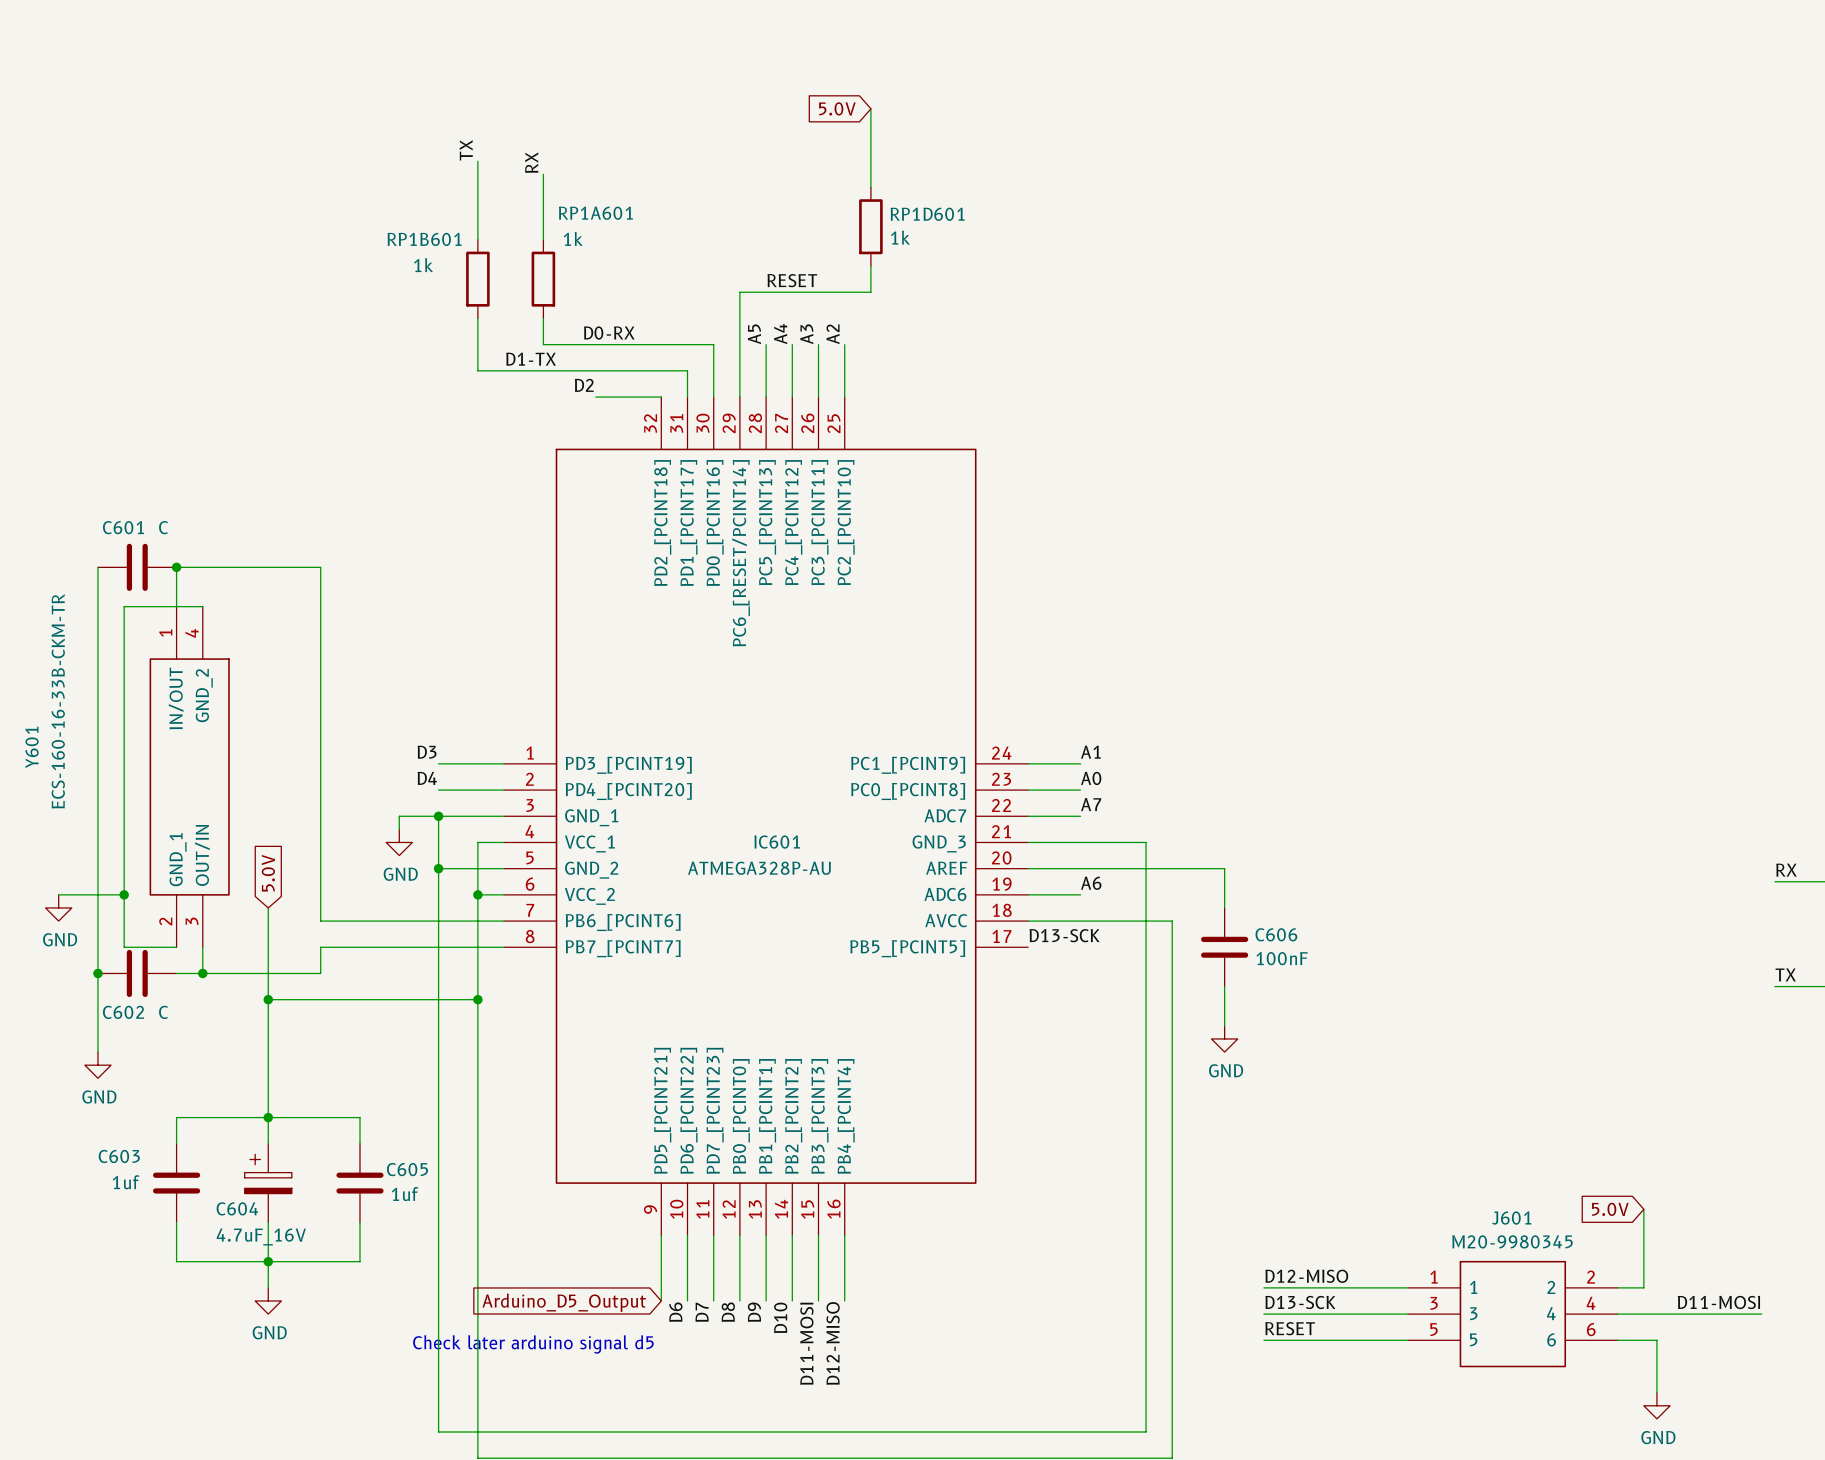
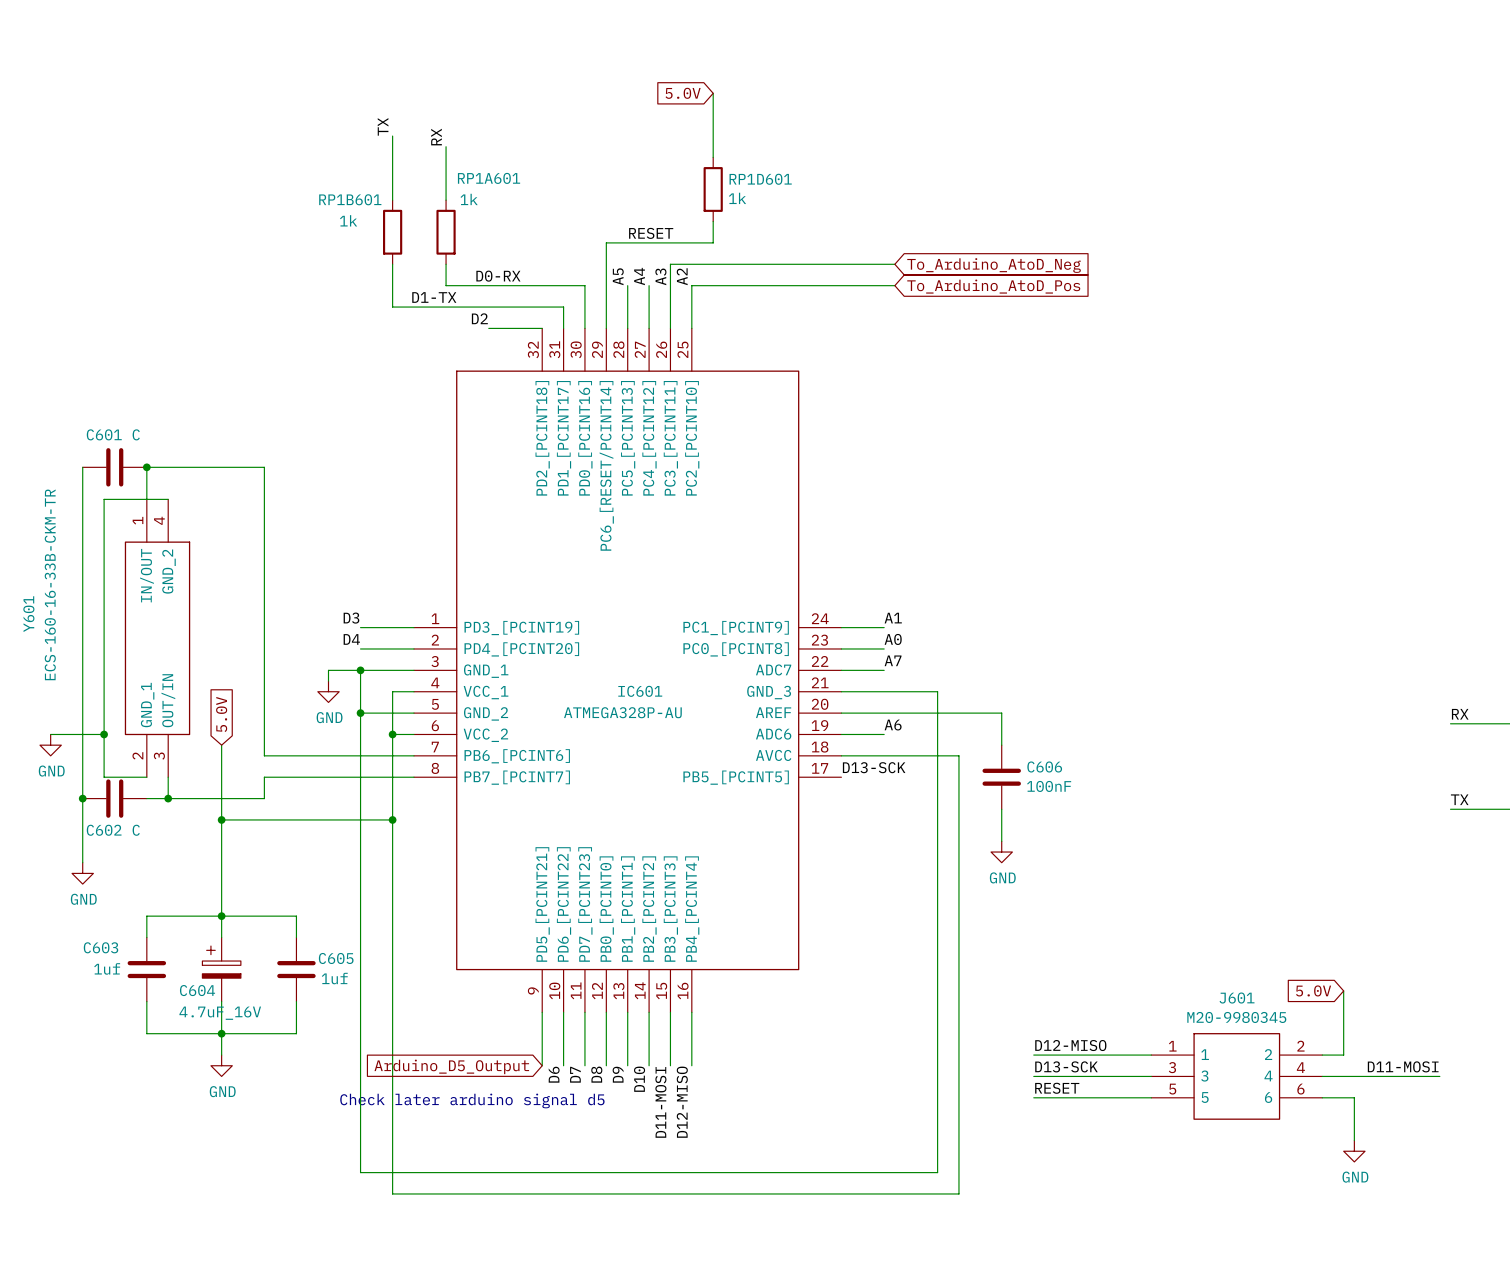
wire: none -> (894, 264) (670, 264) (670, 285)
global label: none -> To_Arduino_AtoD_Neg (994, 265)
wire: none -> (691, 285) (894, 285)
global label: none -> To_Arduino_AtoD_Pos (993, 286)

